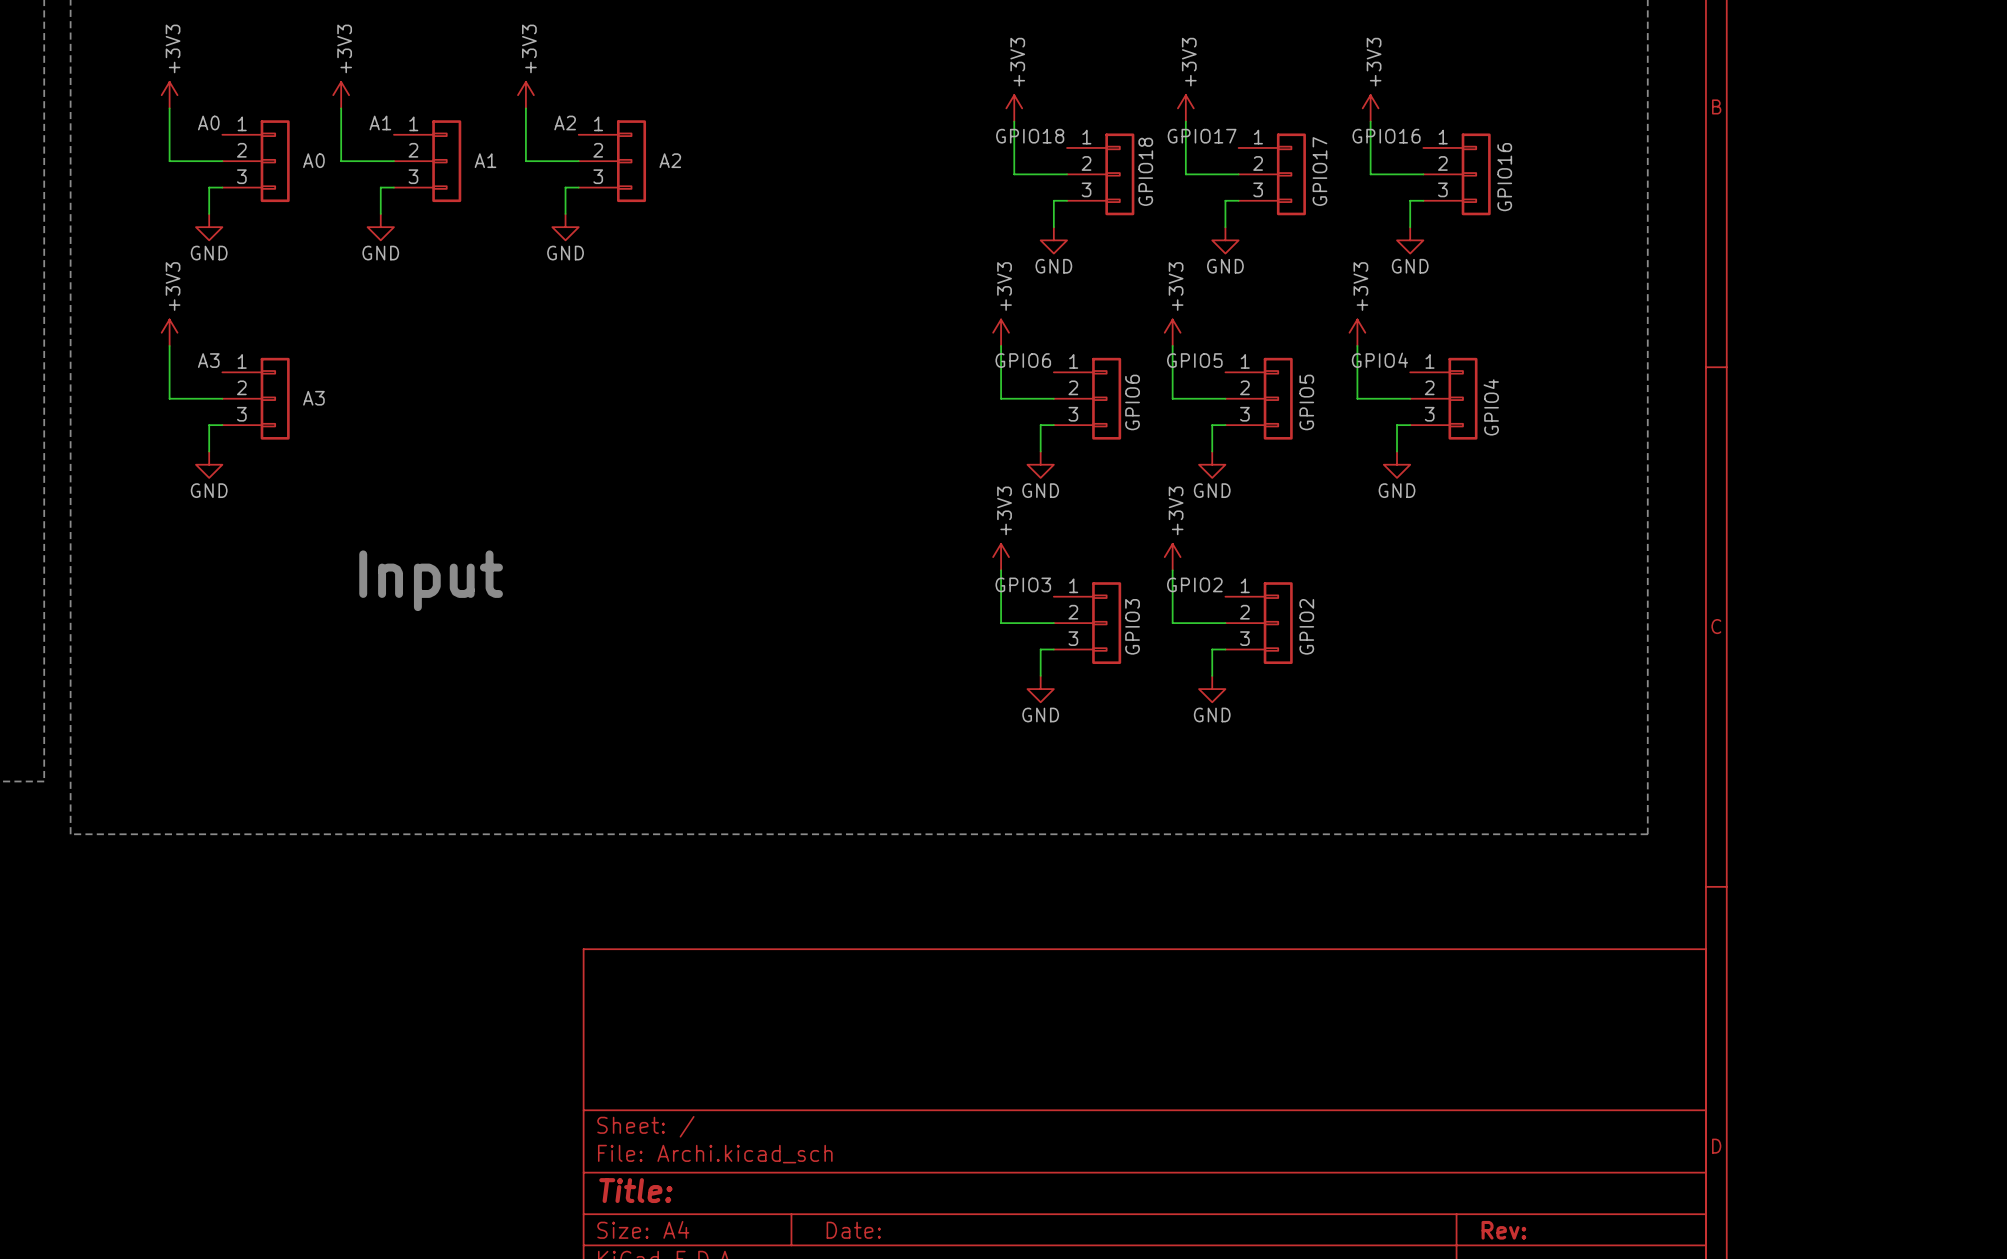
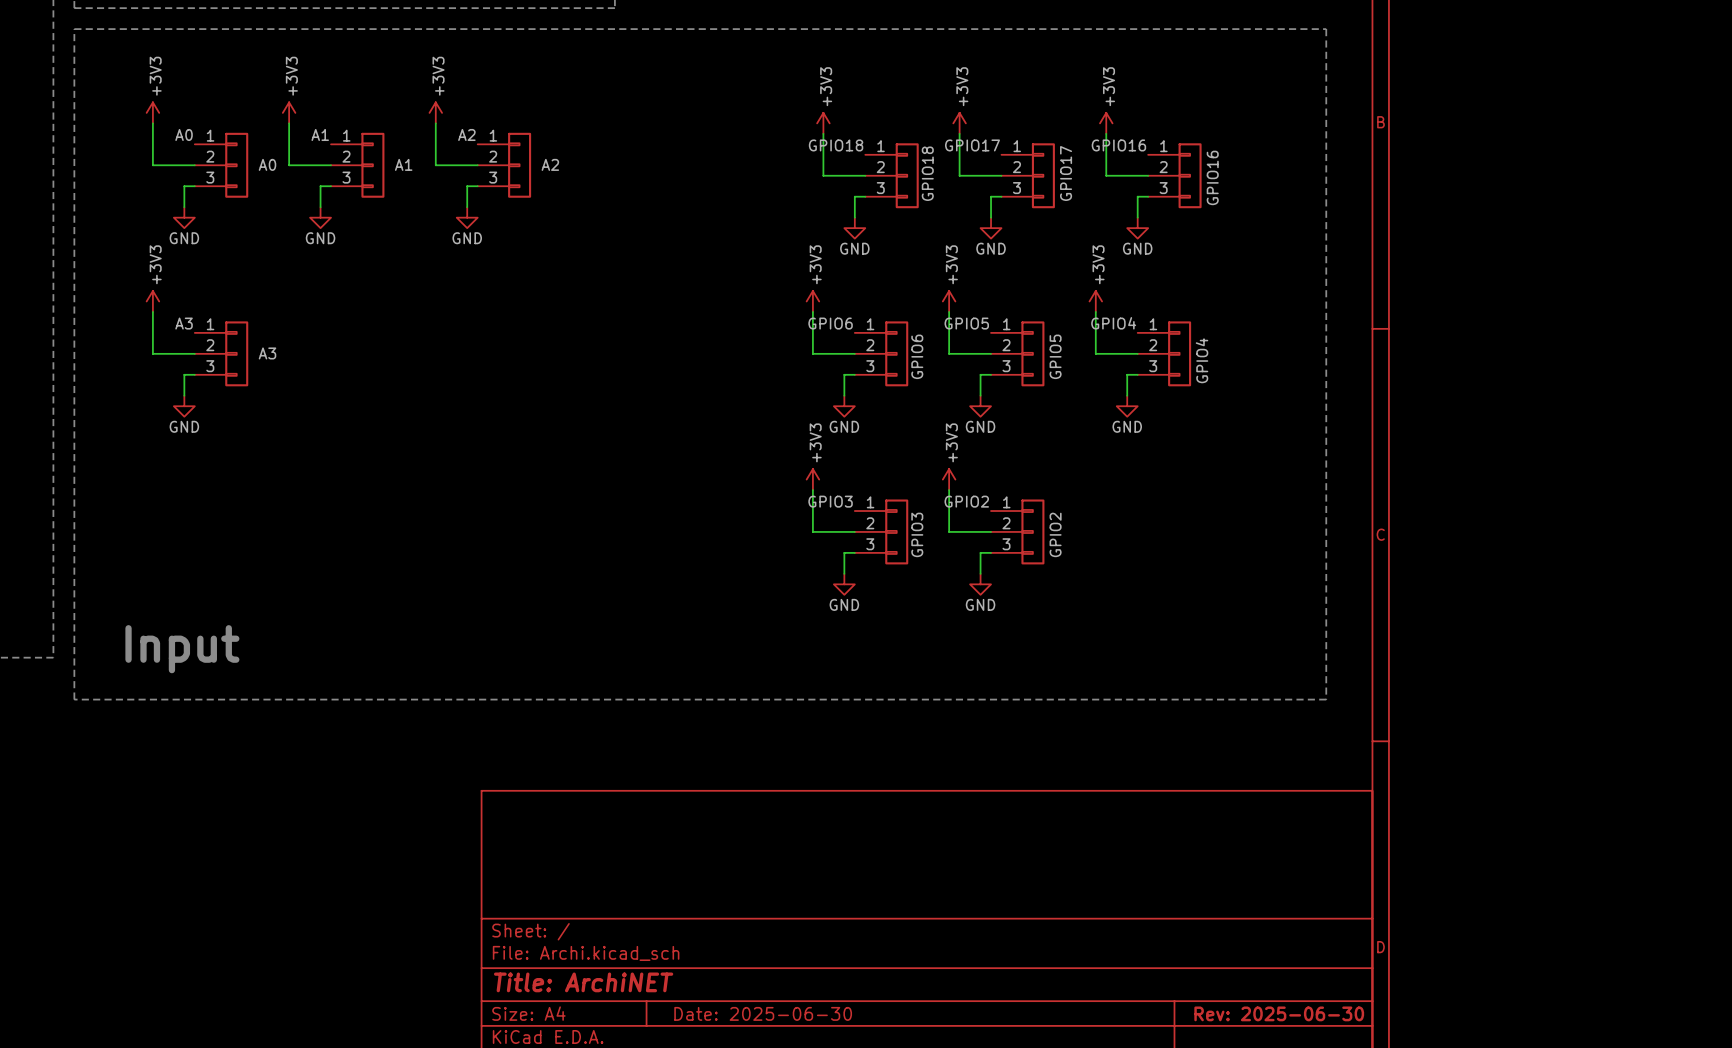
text: Input (431, 580) -> none
text: none -> Input (182, 649)
title block: Title: (635, 1190) -> Title: ArchiNET (583, 982)
title block: Date: (853, 1230) -> Date: 2025-06-30 (763, 1013)
title block: Rev: (1503, 1230) -> Rev: 2025-06-30 (1279, 1013)

